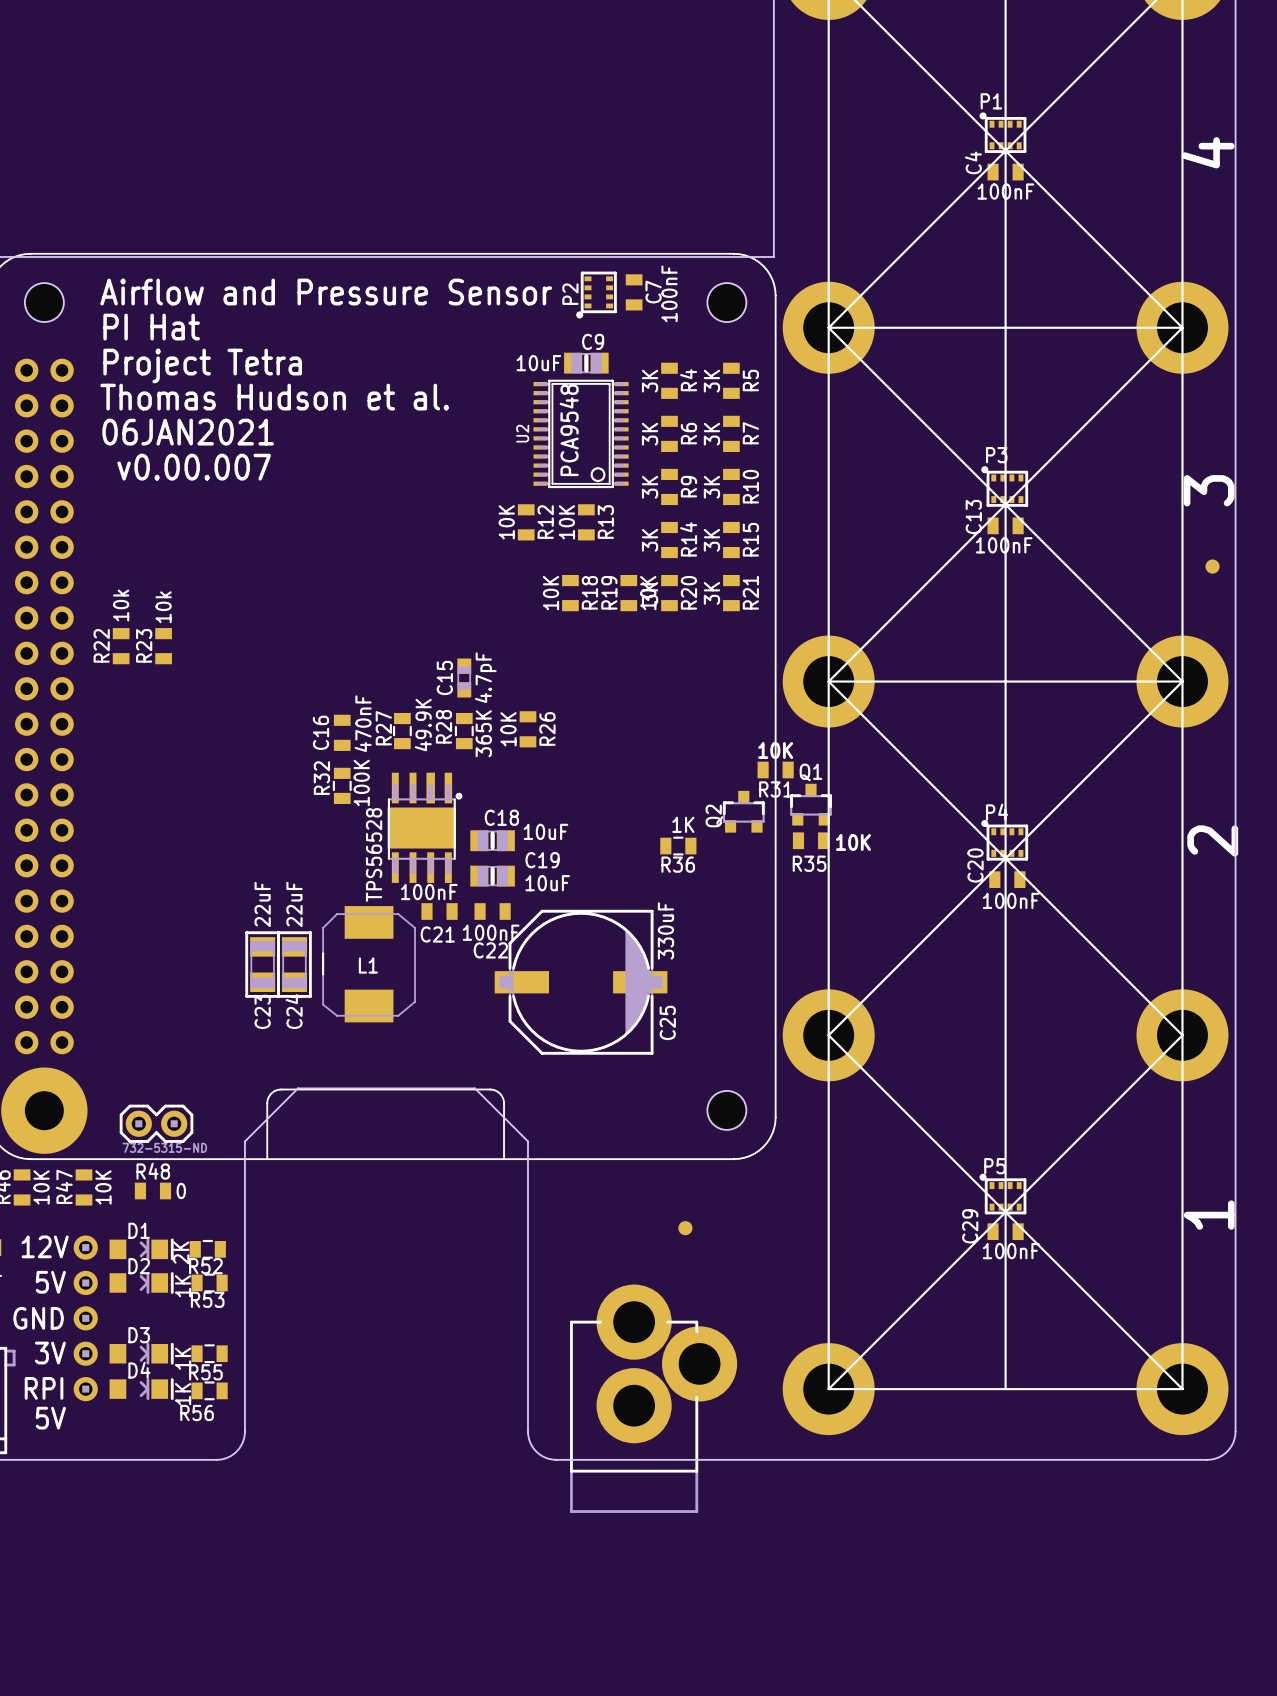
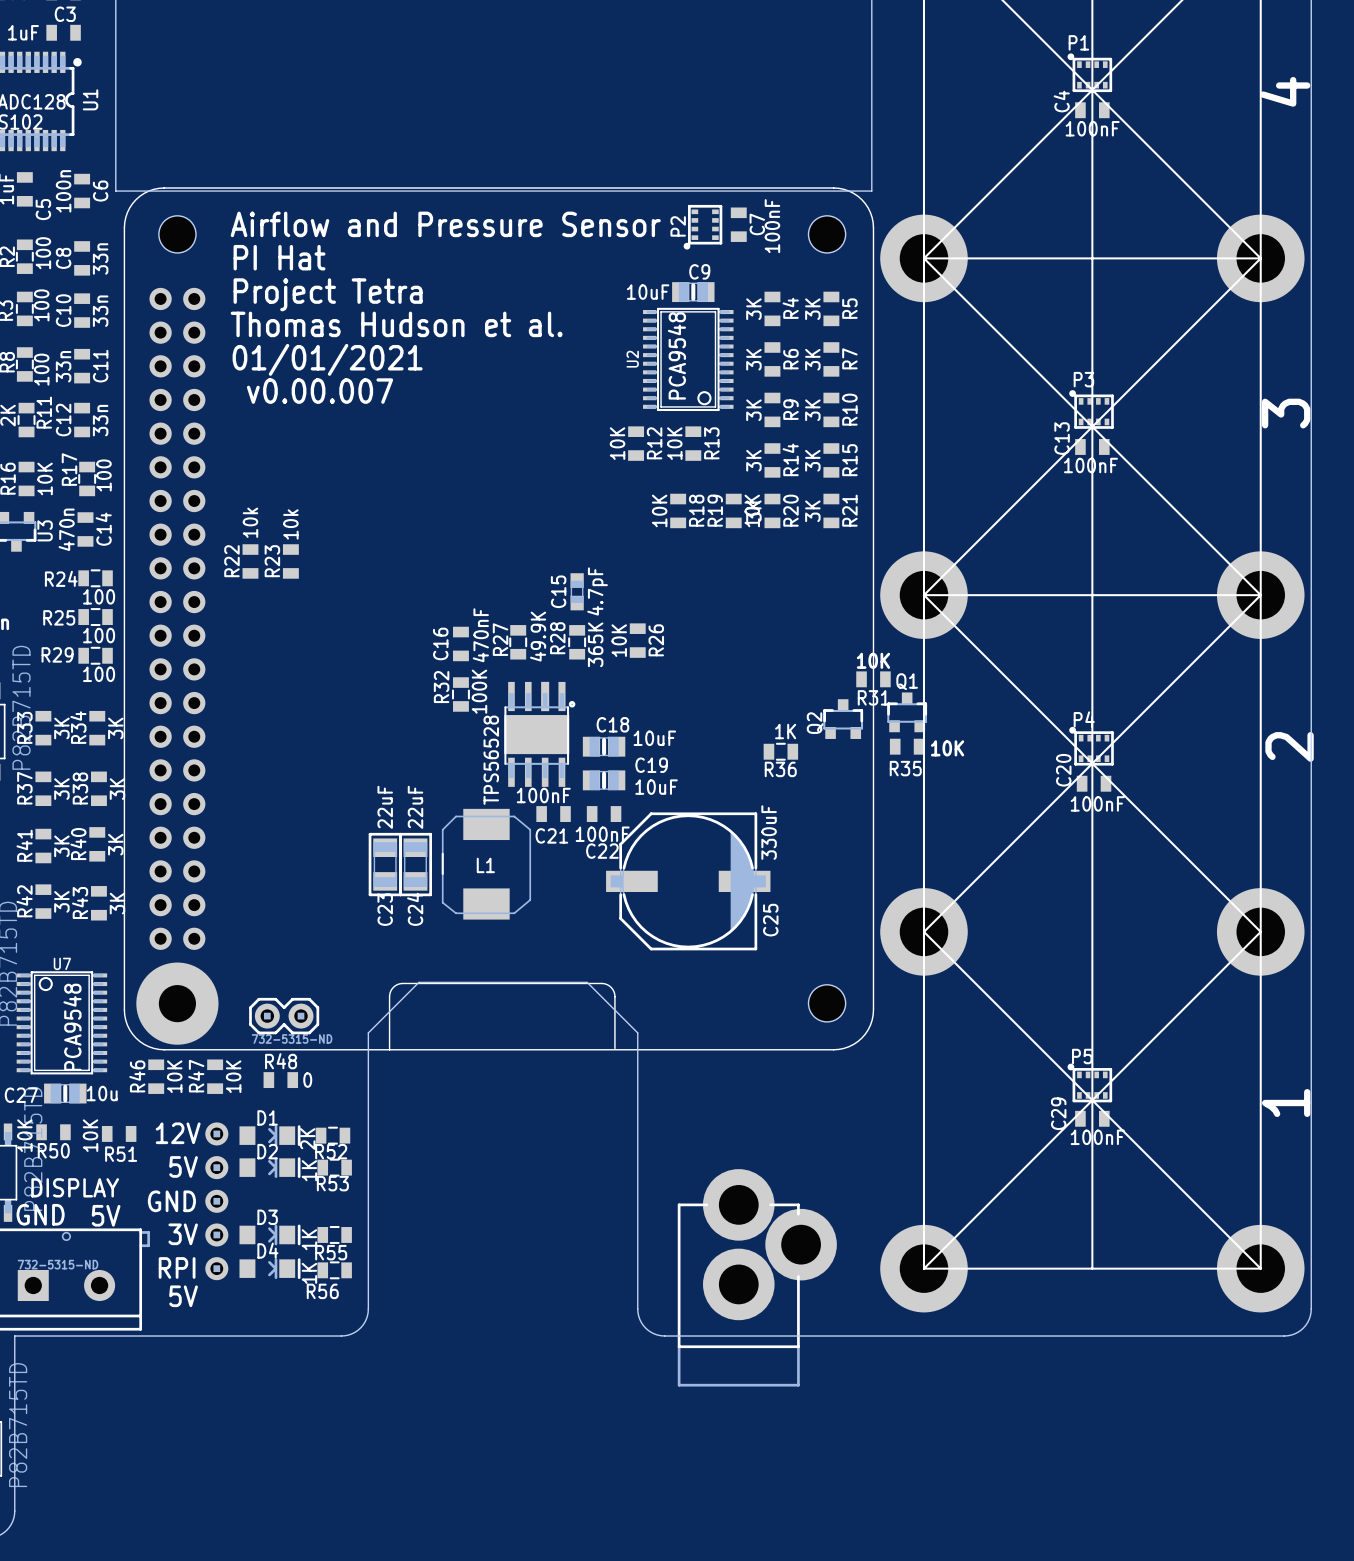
text: 06JAN2021 (188, 432) -> 01/01/2021 (327, 359)
part: (1212, 566) -> none
part: (685, 1228) -> none

